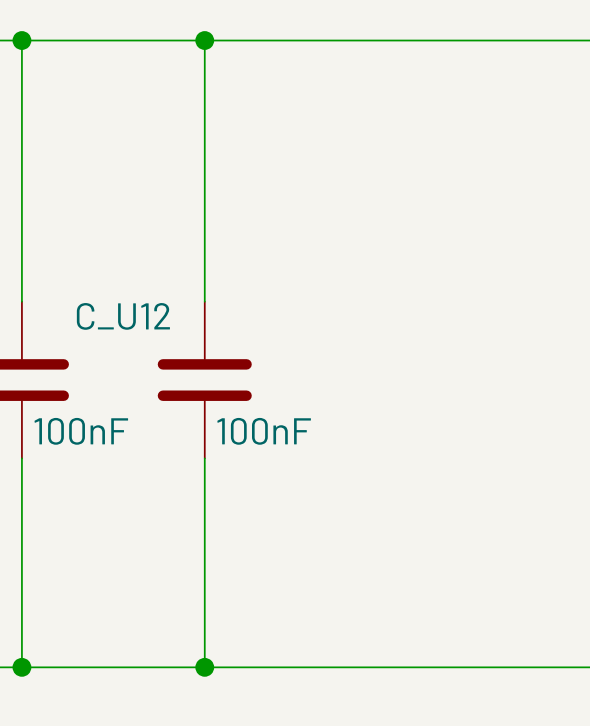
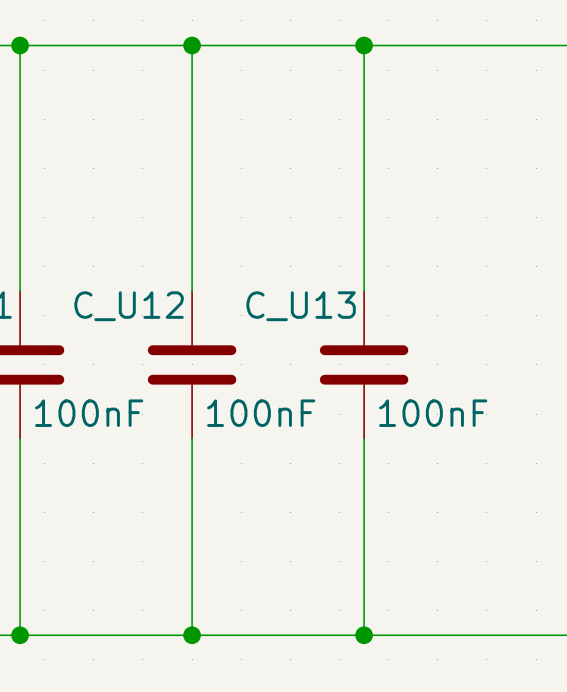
wire: none -> (364, 45) (364, 291)
junction: none -> (364, 45)
C_U13: none -> 100nF (364, 364)
wire: none -> (364, 438) (364, 635)
junction: none -> (364, 635)

